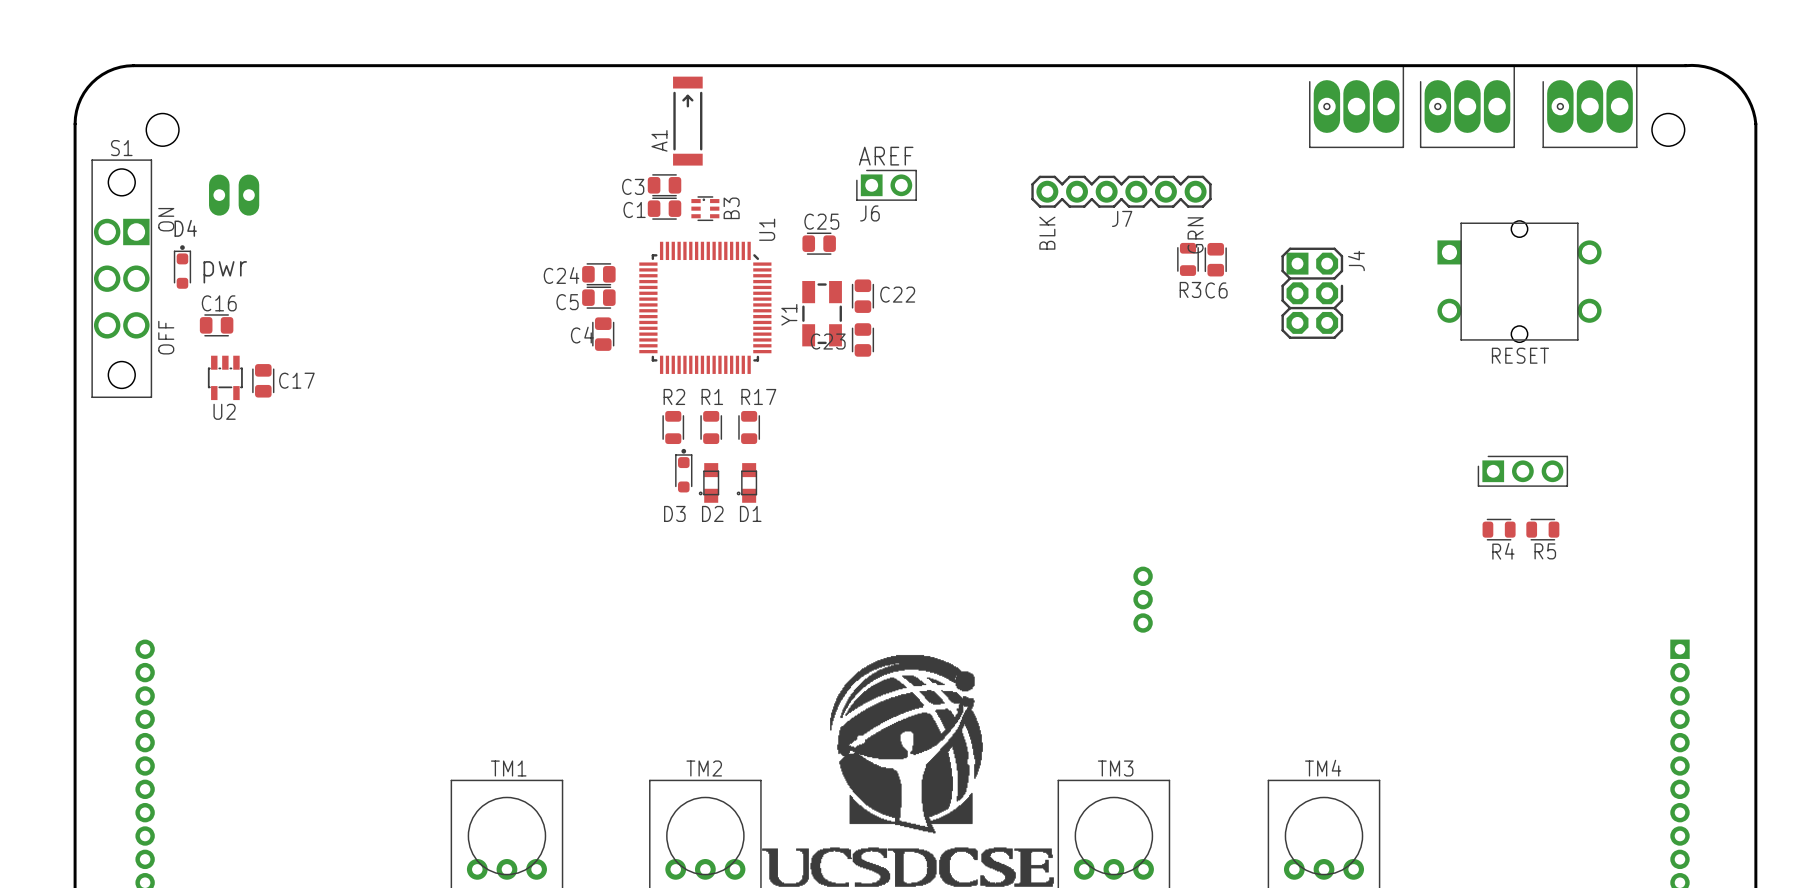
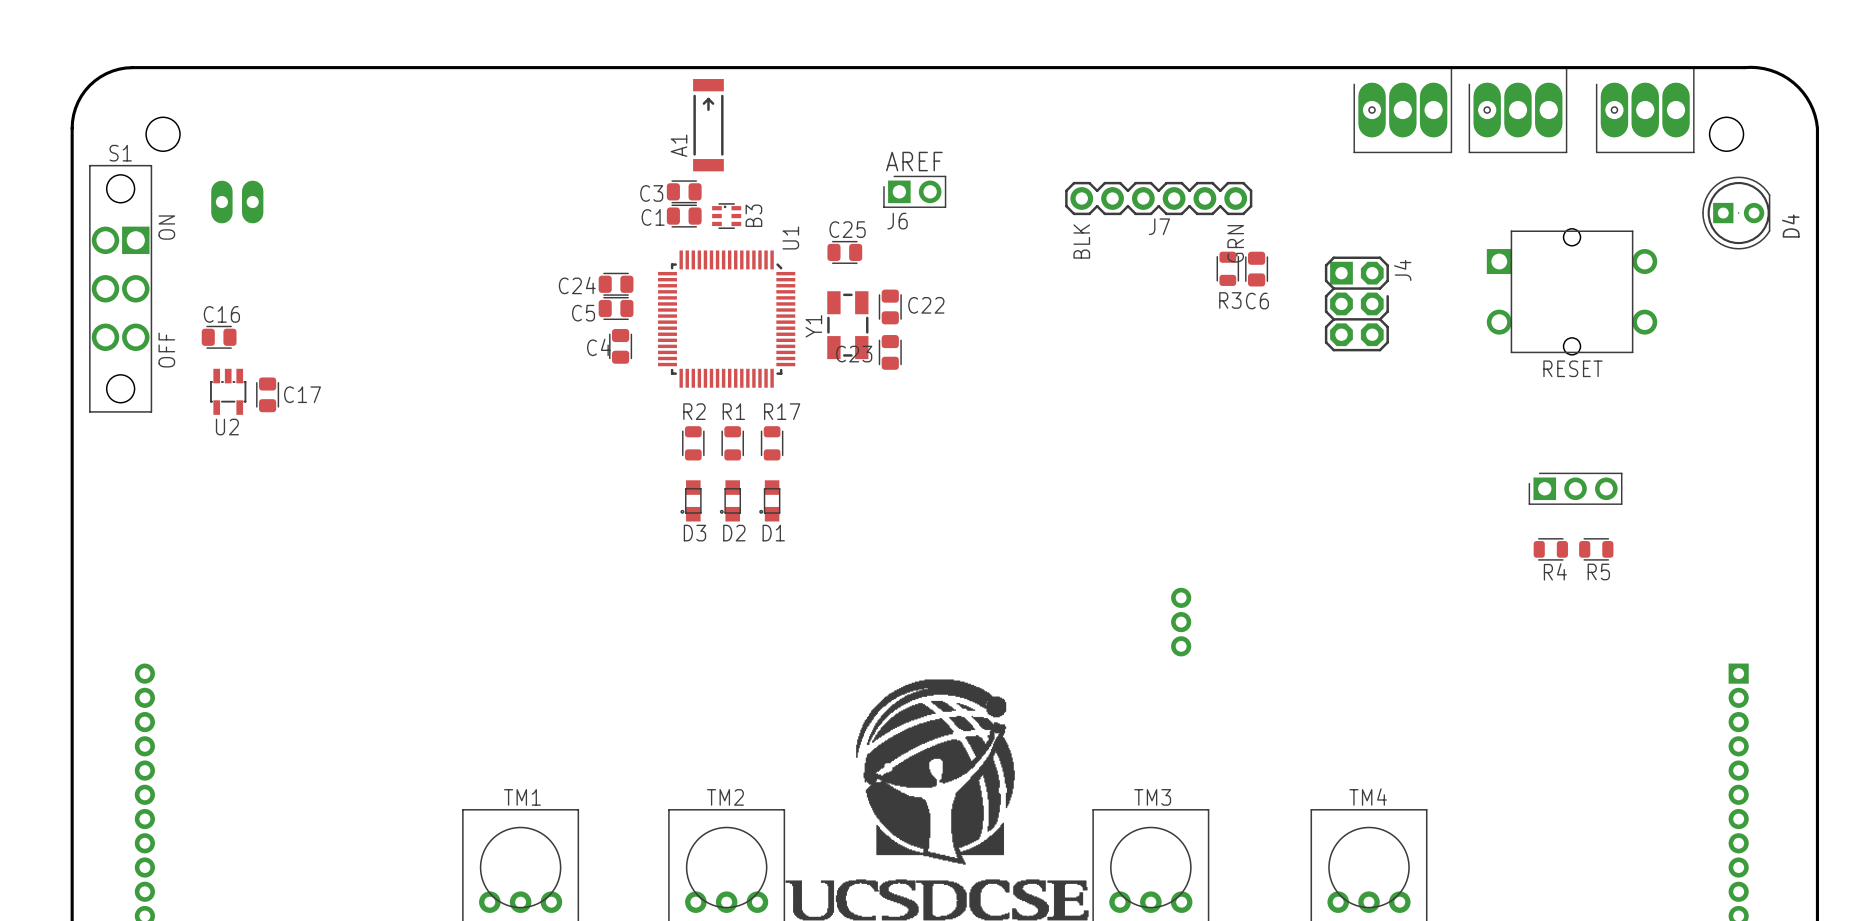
D4 name position: D4 (185, 228) -> D4 (1790, 226)
D4 footprint: [173, 245, 192, 289] -> [1702, 176, 1771, 250]
text: pwr (225, 272) -> none
D3 footprint: [675, 448, 693, 493] -> [680, 480, 702, 522]

